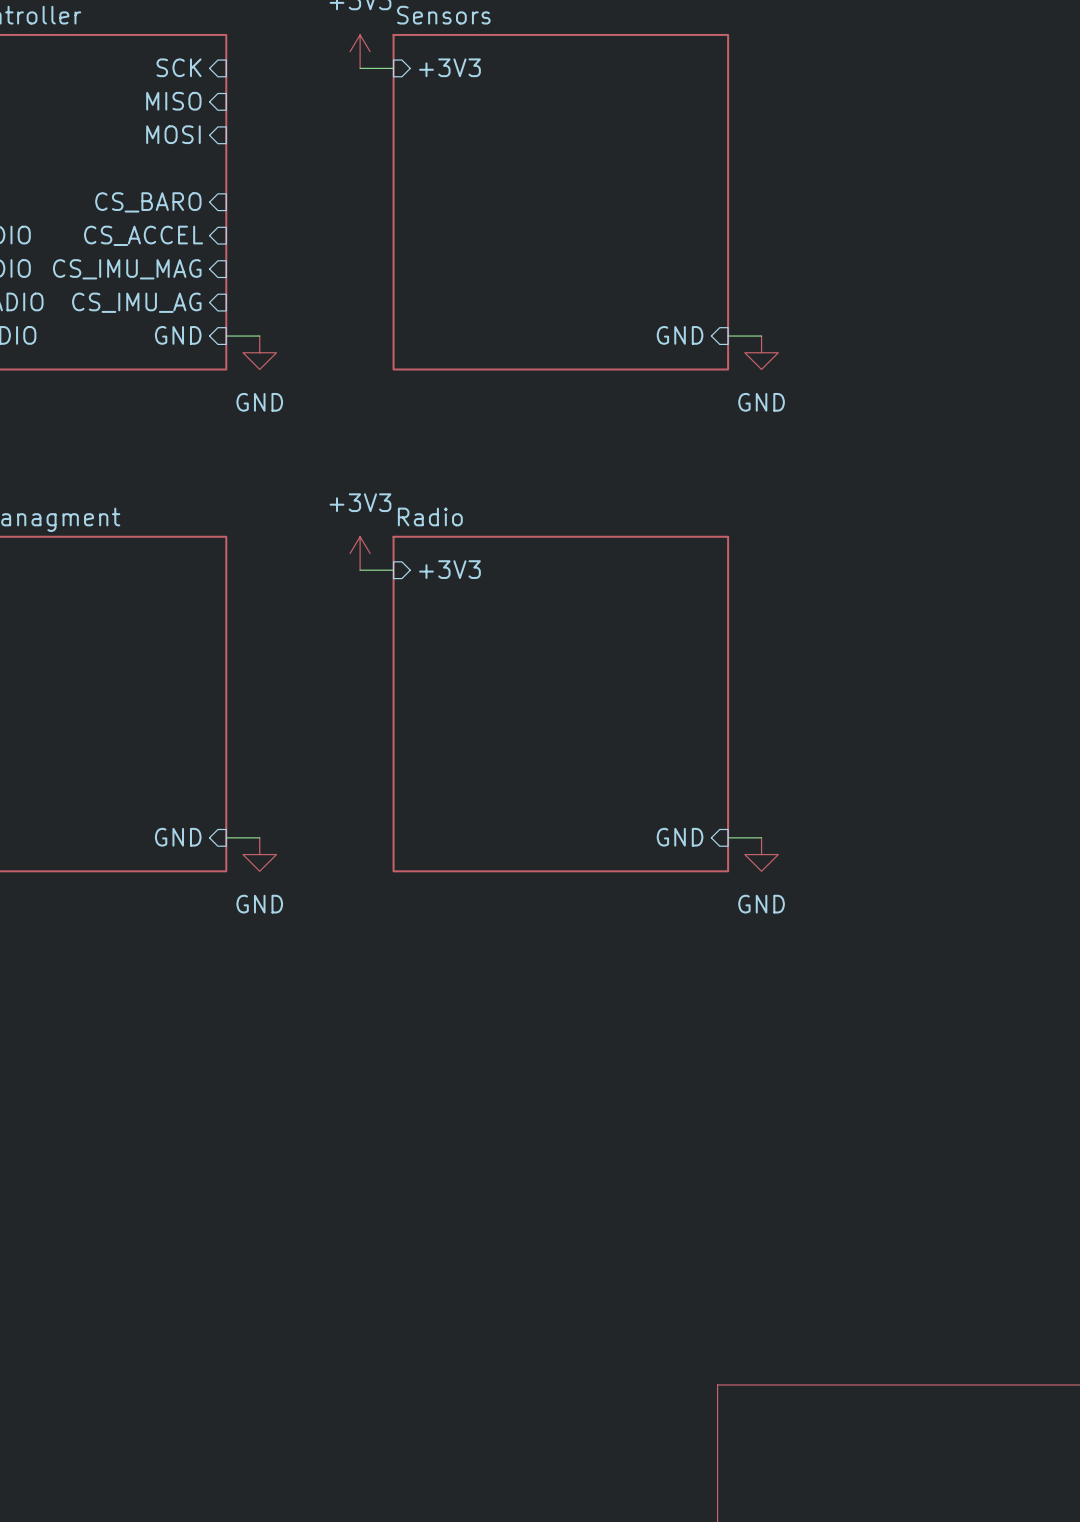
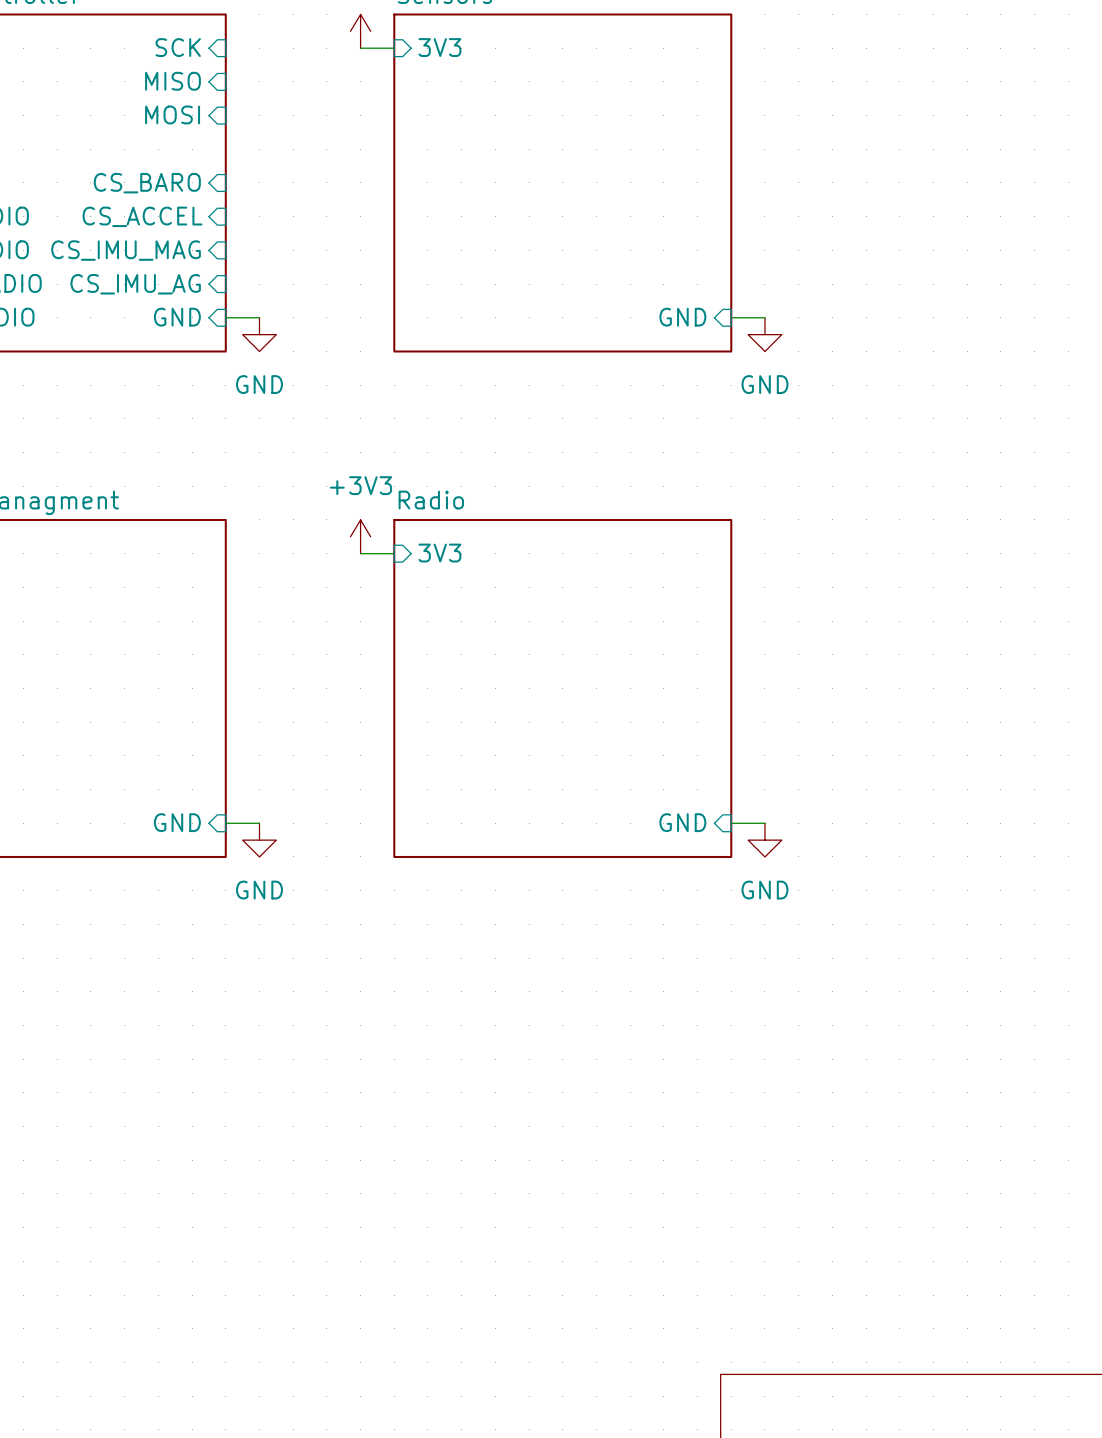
sheet pin: +3V3 (449, 67) -> 3V3 (439, 47)
sheet pin: +3V3 (449, 569) -> 3V3 (439, 553)

